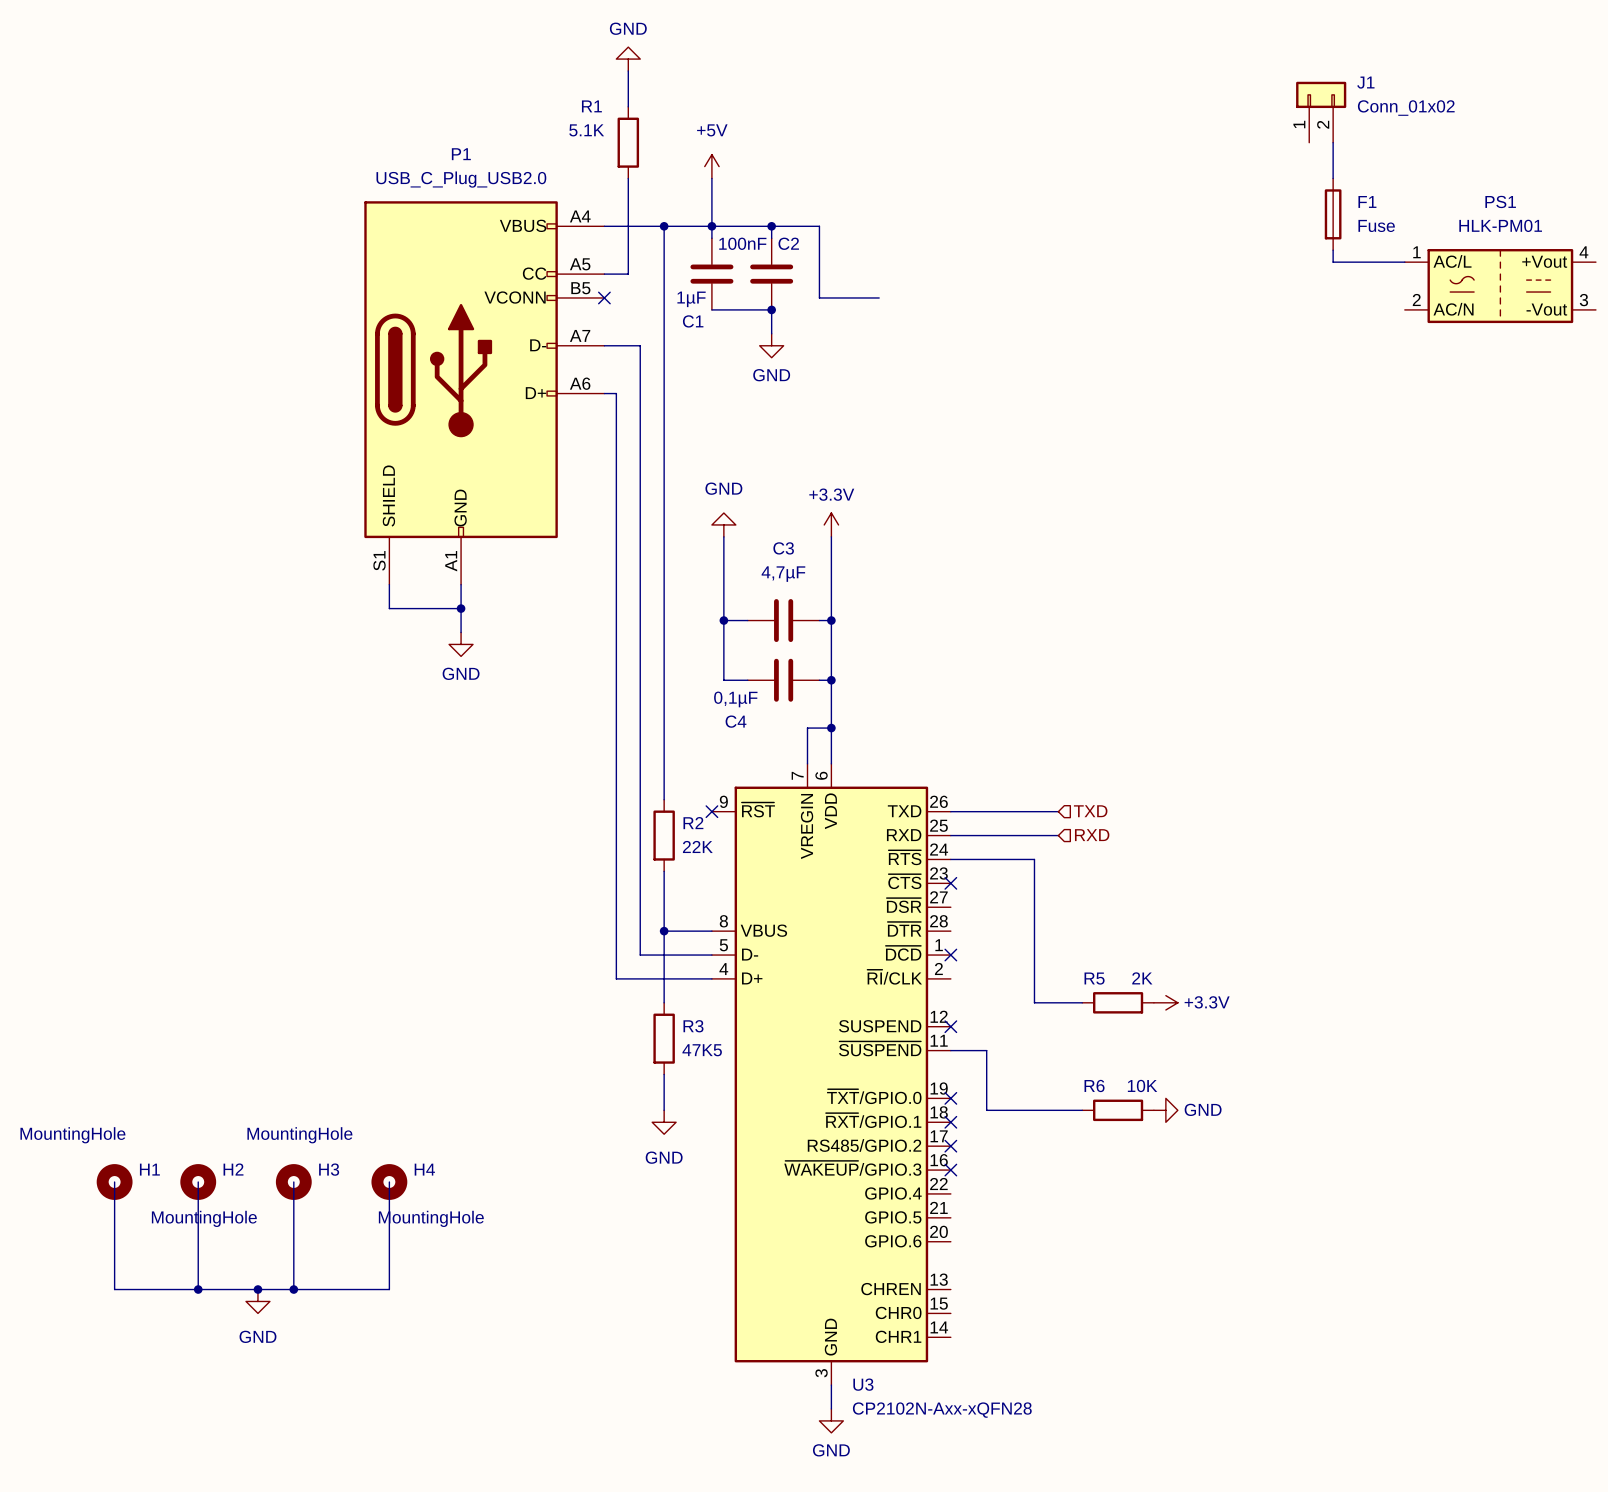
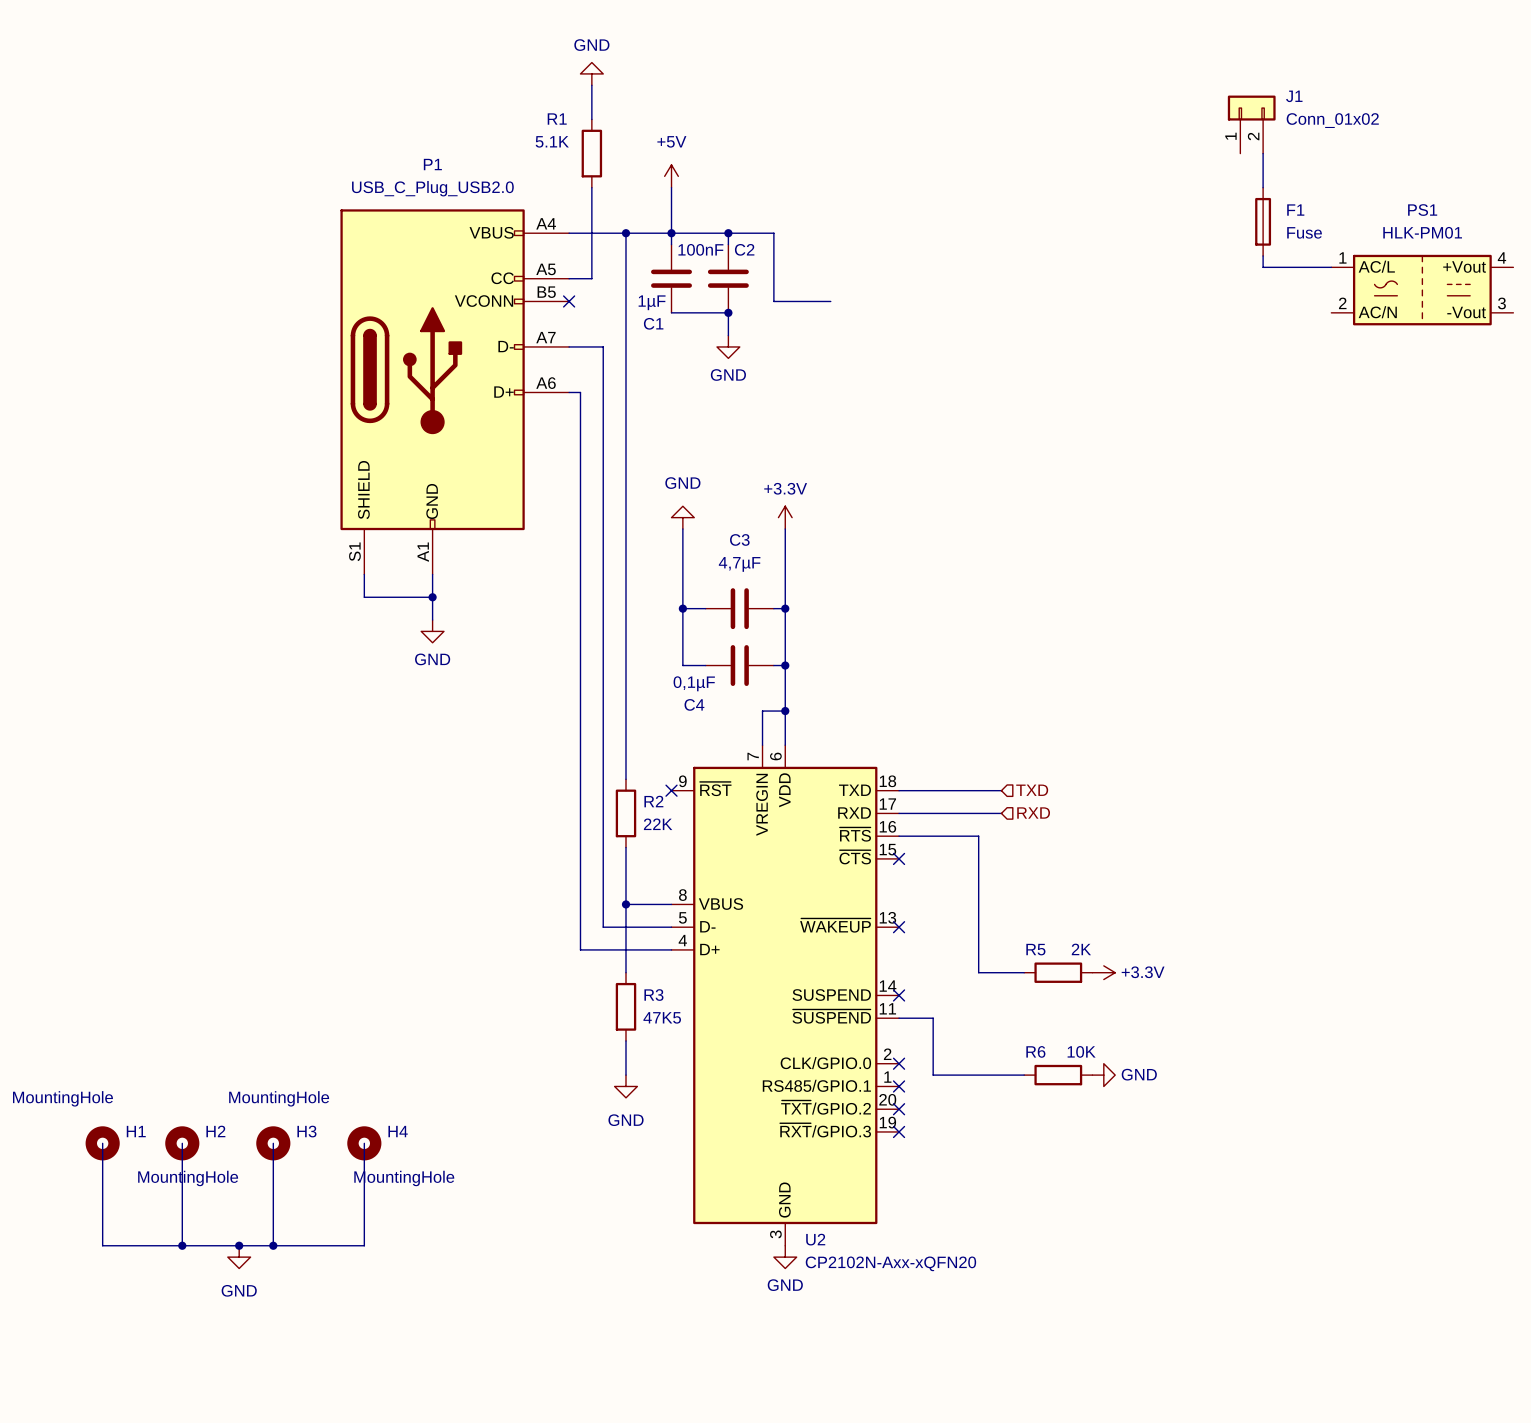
U2: none -> CP2102N-Axx-xQFN20 (785, 995)
U3: CP2102N-Axx-xQFN28 (831, 1074) -> none
wire: (831, 1385) (831, 1408) -> none
power symbol position: GND (831, 1420) -> GND (785, 1257)

